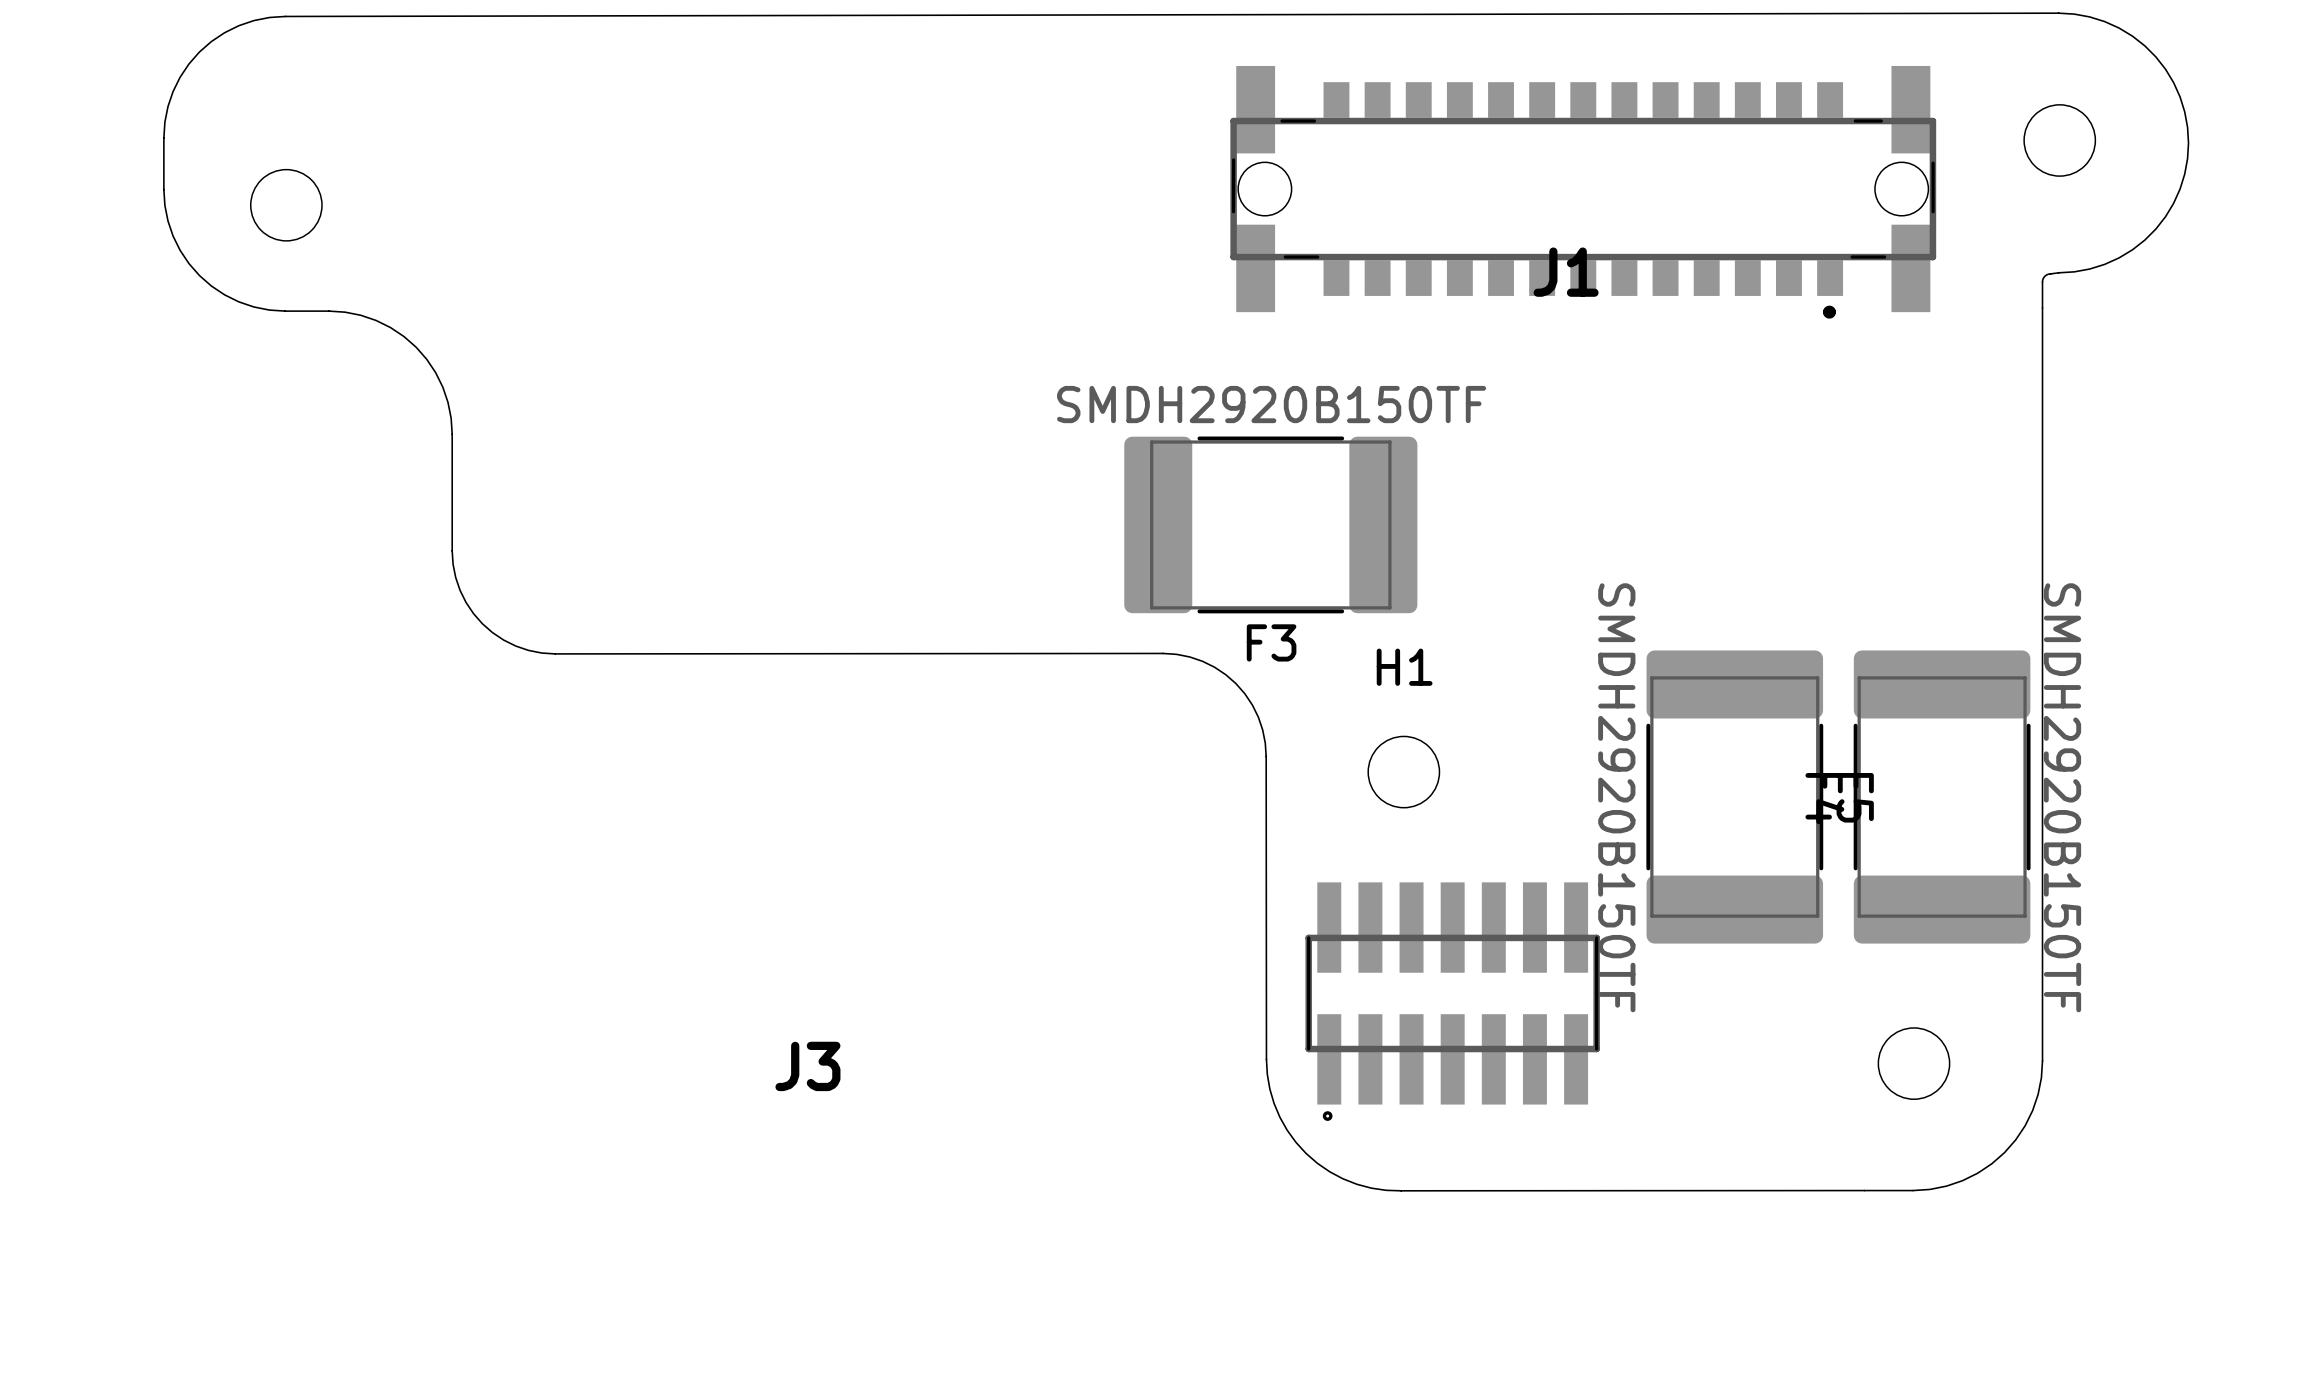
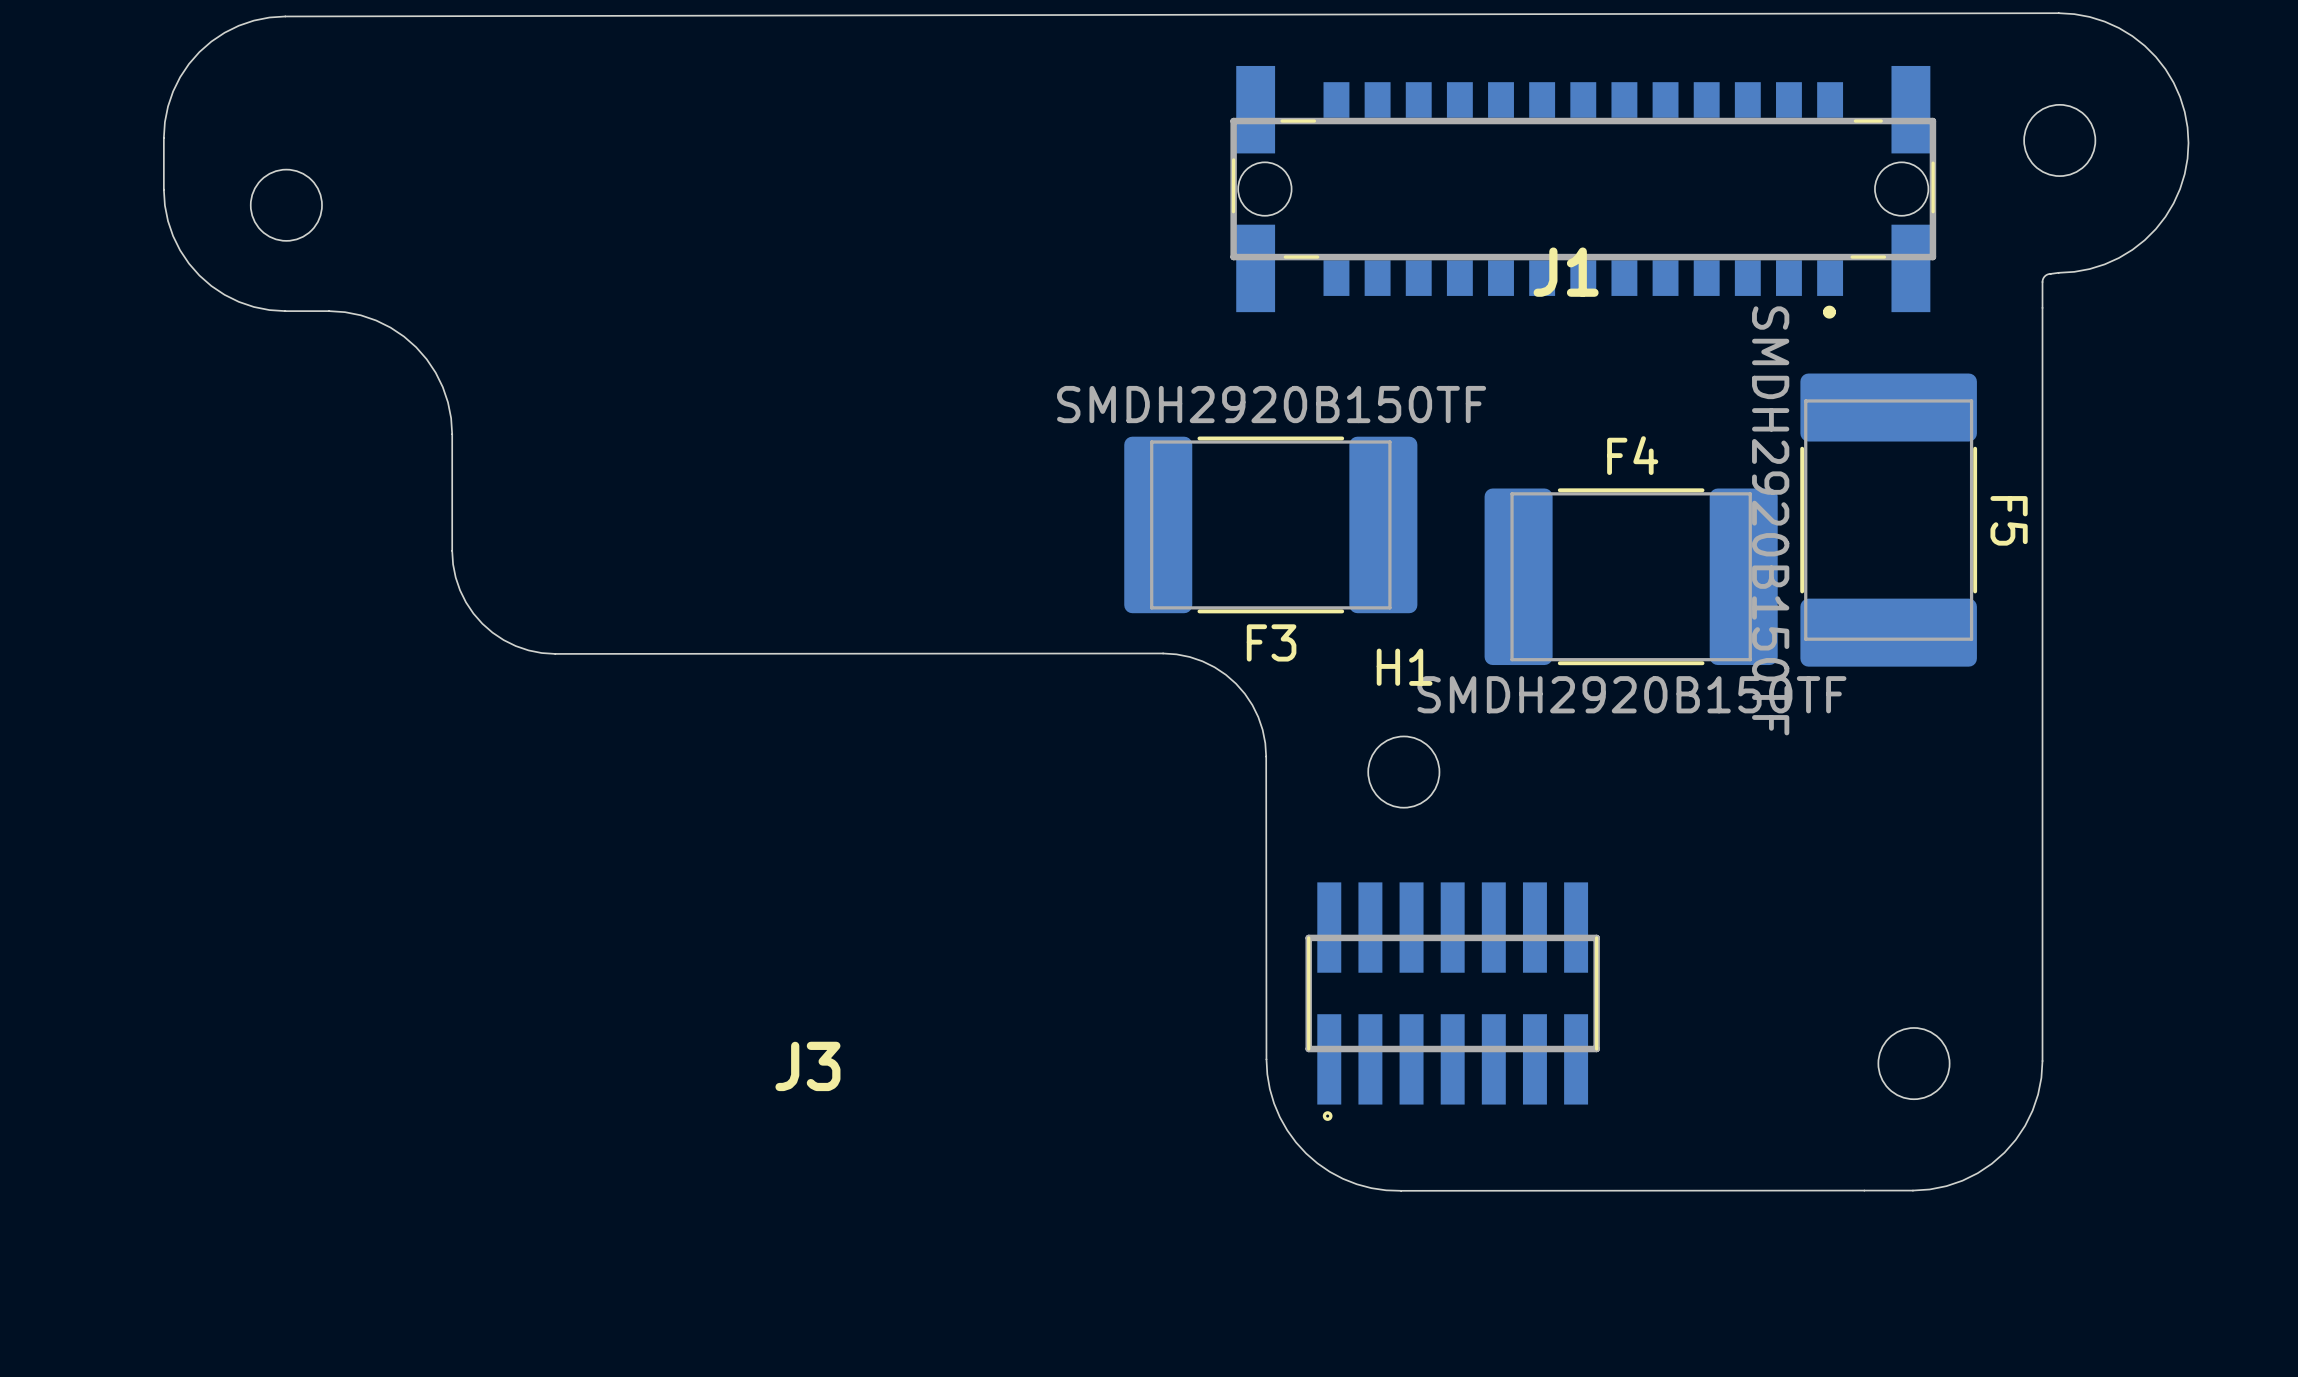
F5 position: (1734, 797) -> (1888, 520)
F4 rotation: 0° (1942, 797) -> 90° clockwise (1631, 576)
F4 position: (1942, 797) -> (1631, 576)

